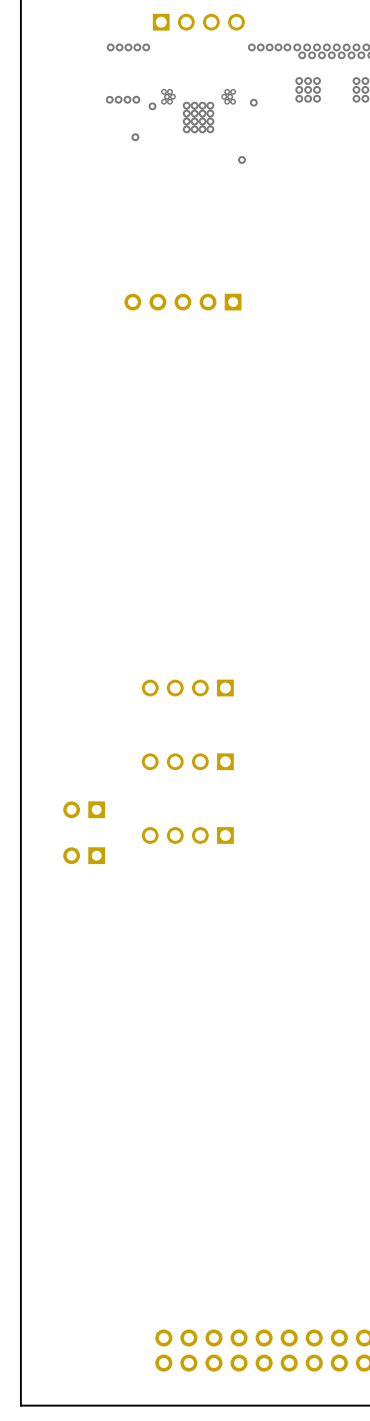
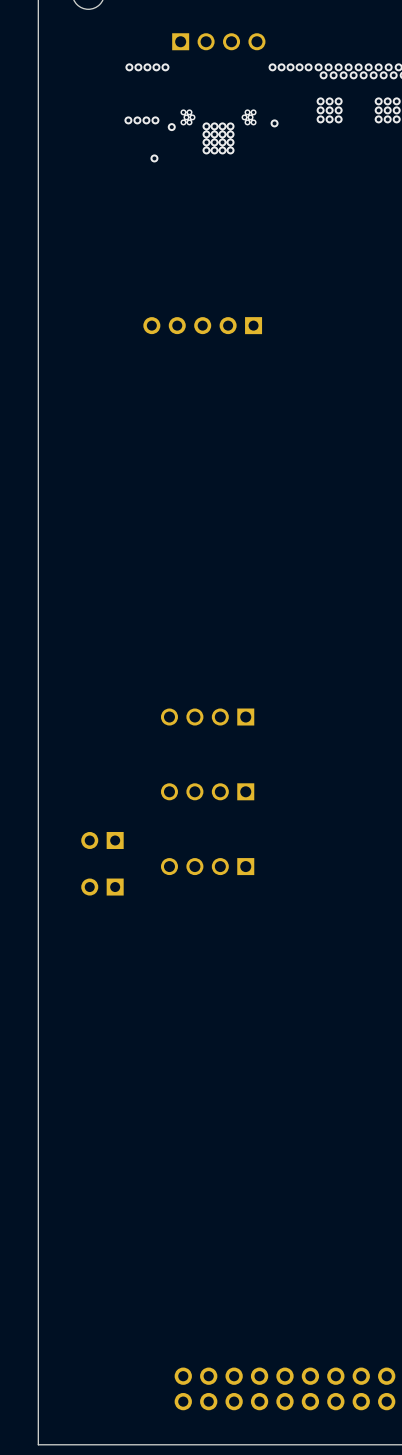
via: (241, 159) -> none

